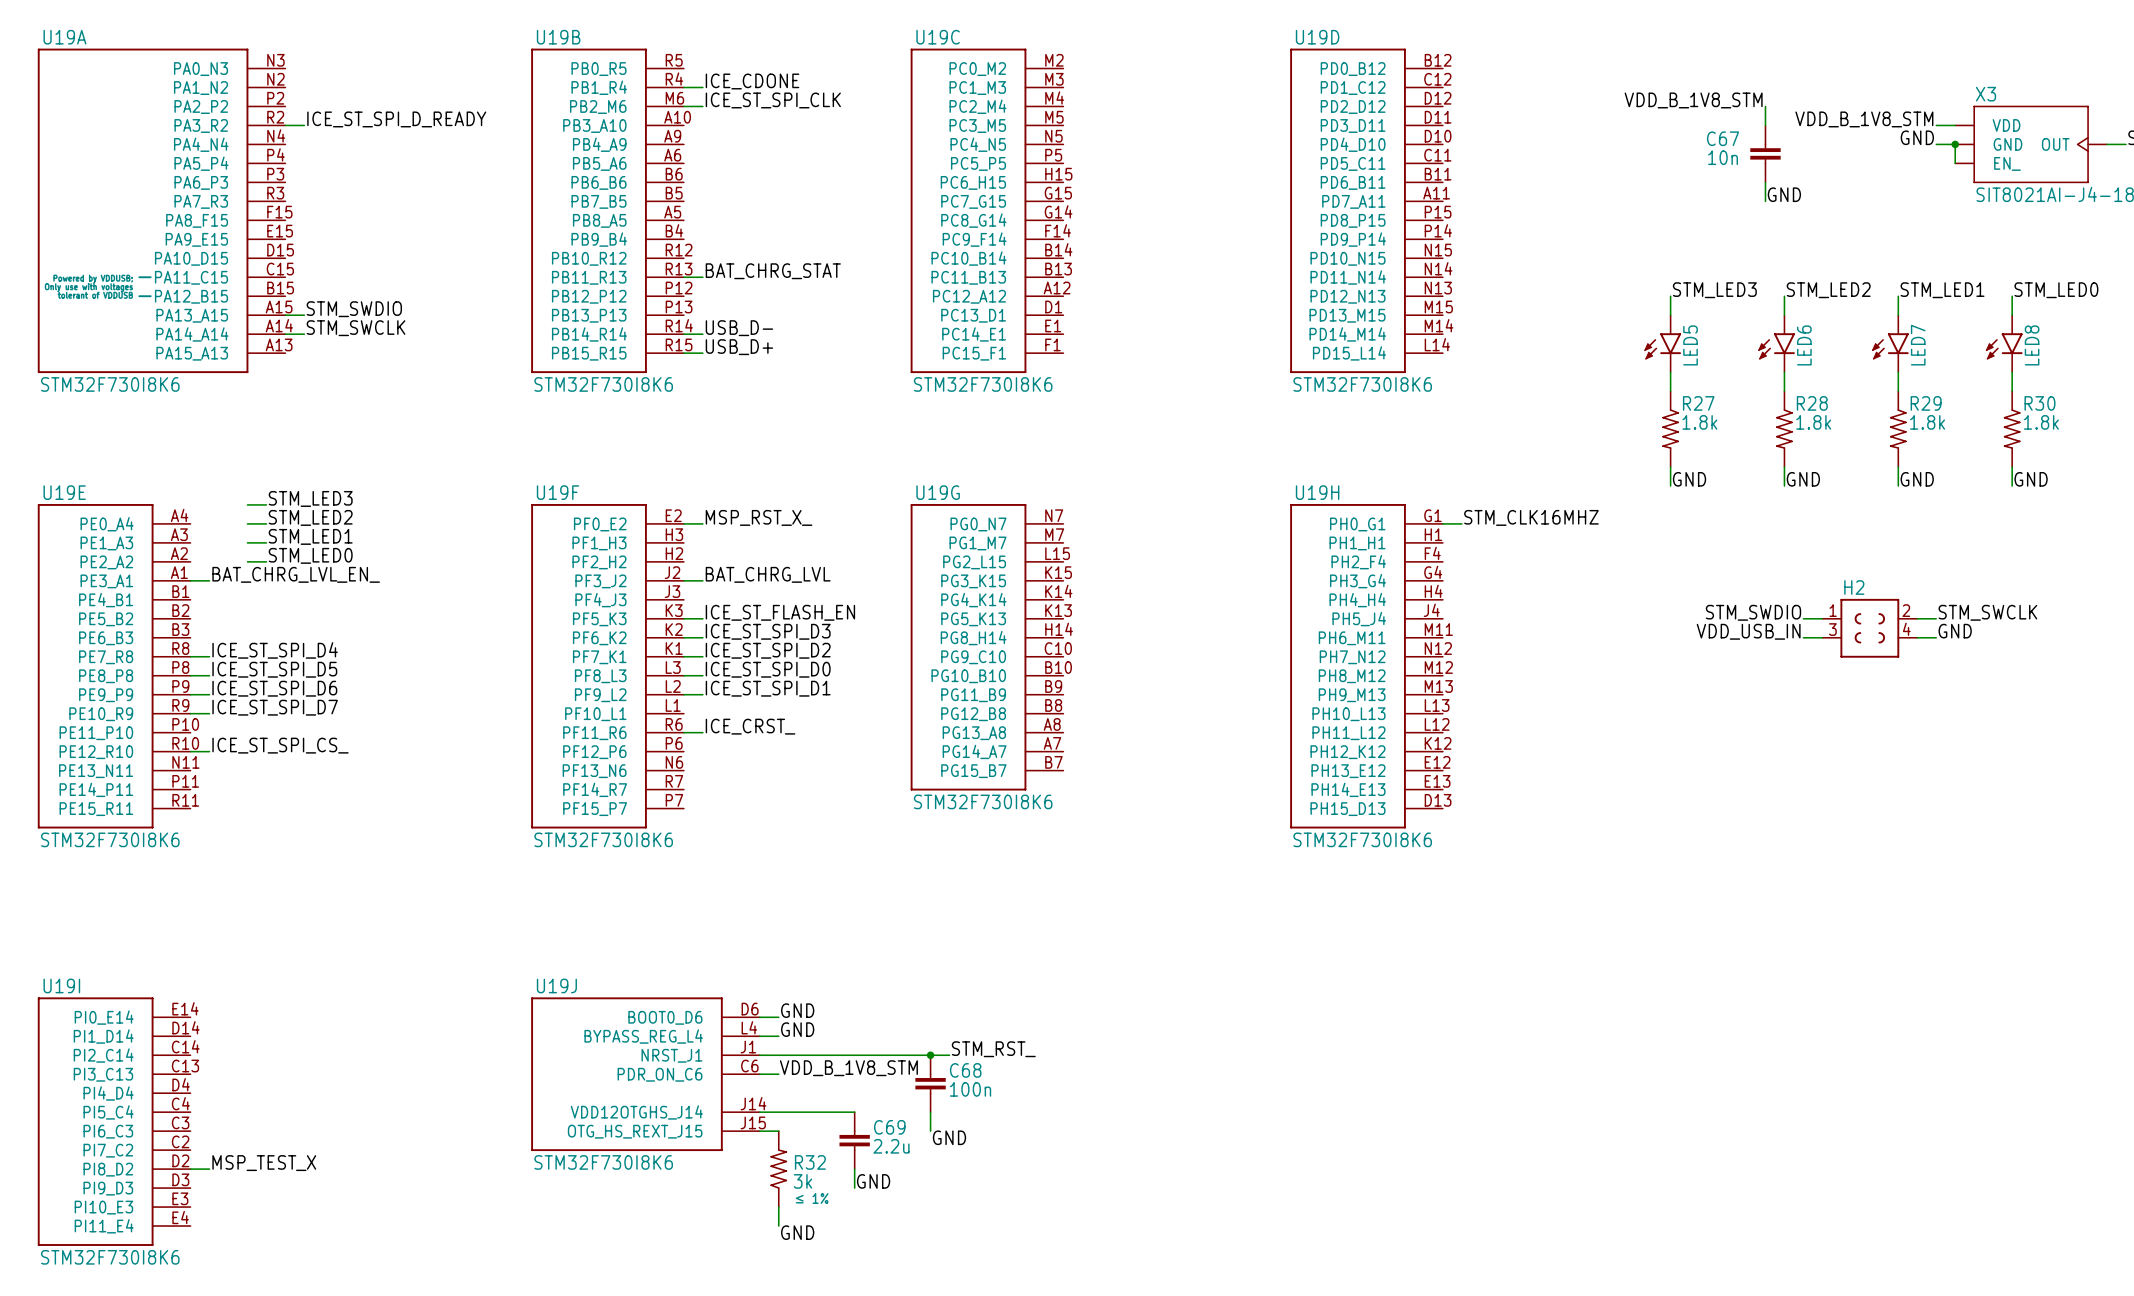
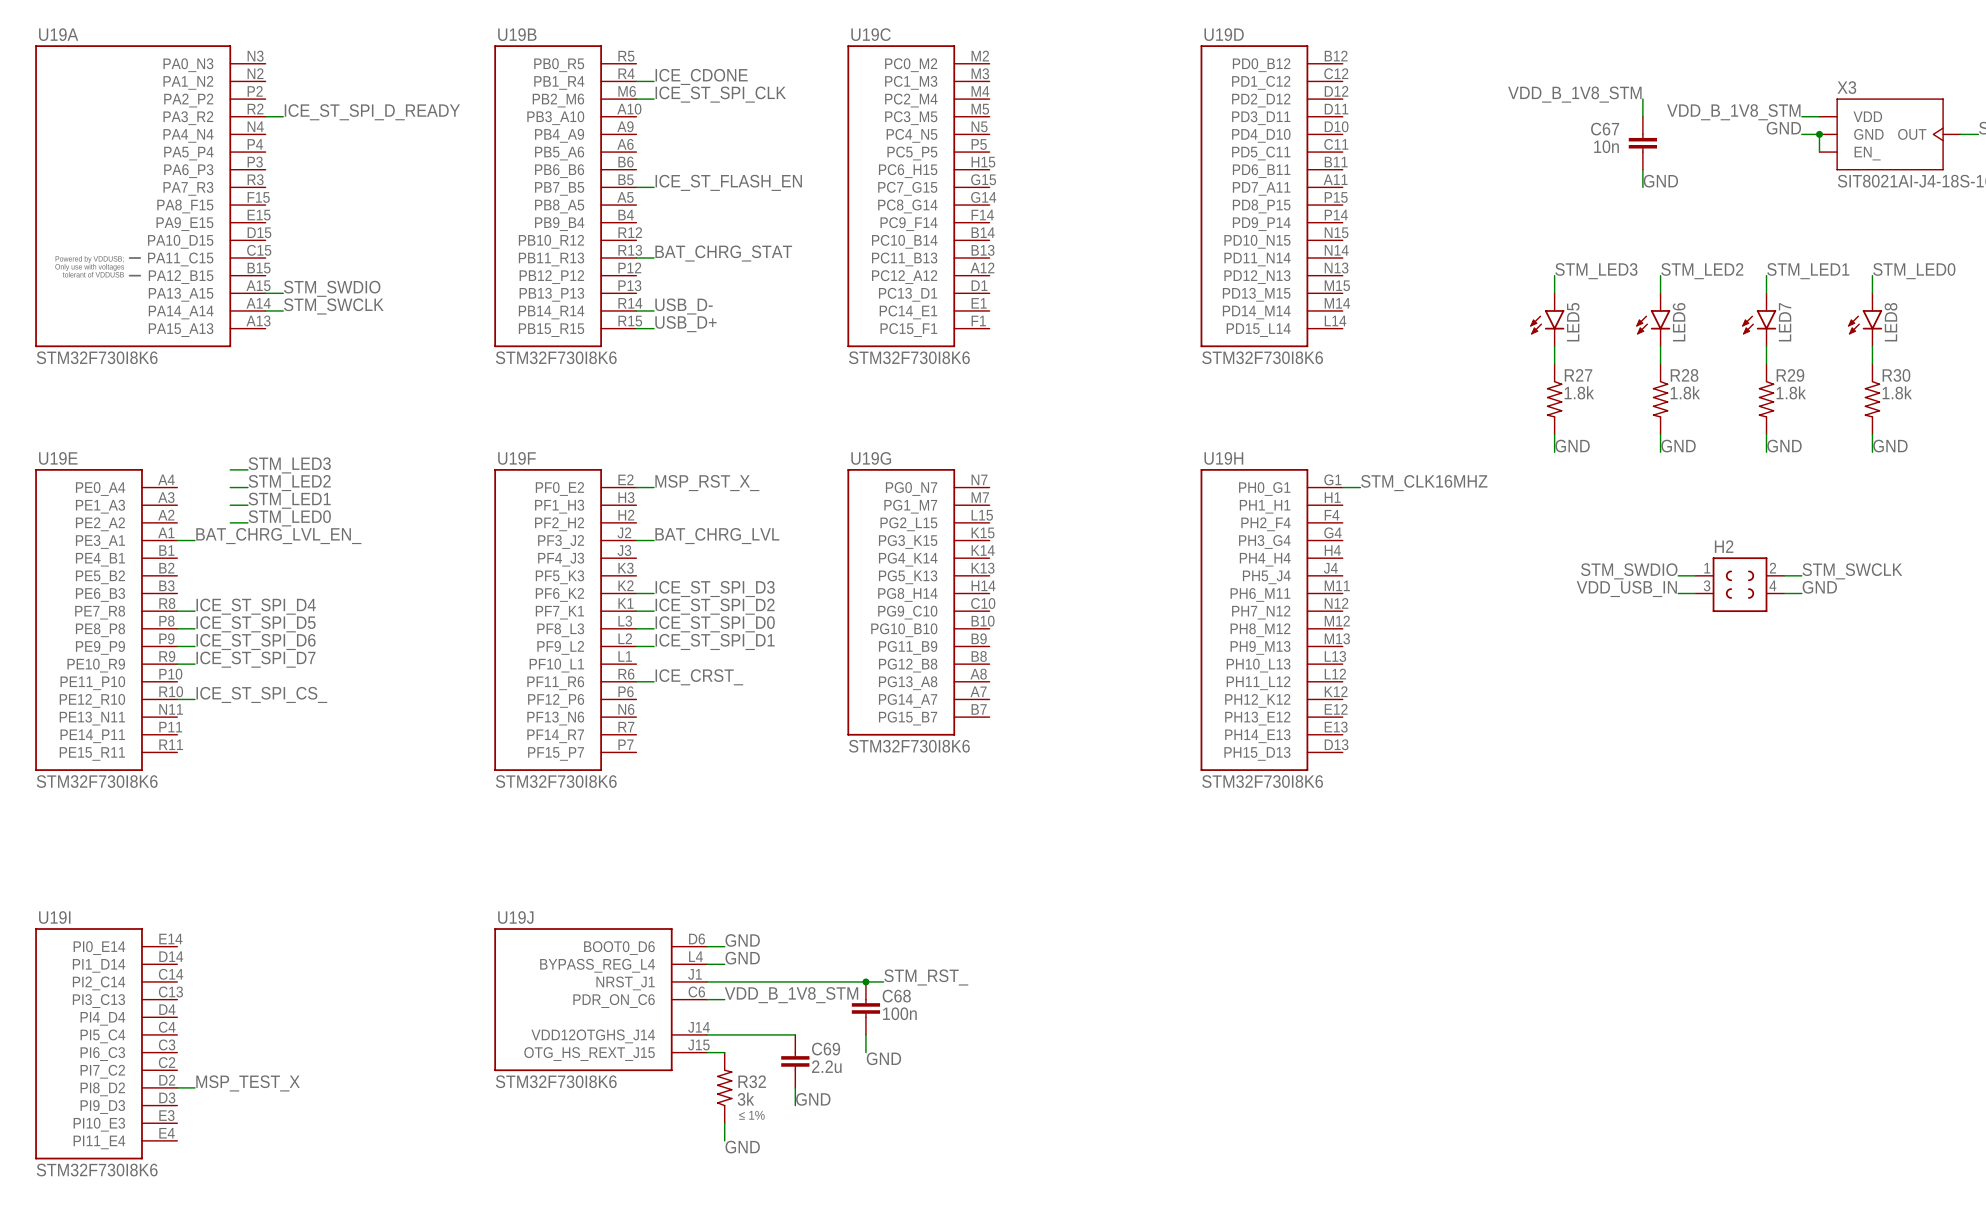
label: none -> ICE_ST_FLASH_EN (728, 182)
wire: none -> (636, 187) (654, 187)
label: ICE_ST_FLASH_EN (780, 612) -> none
wire: (683, 618) (702, 618) -> none

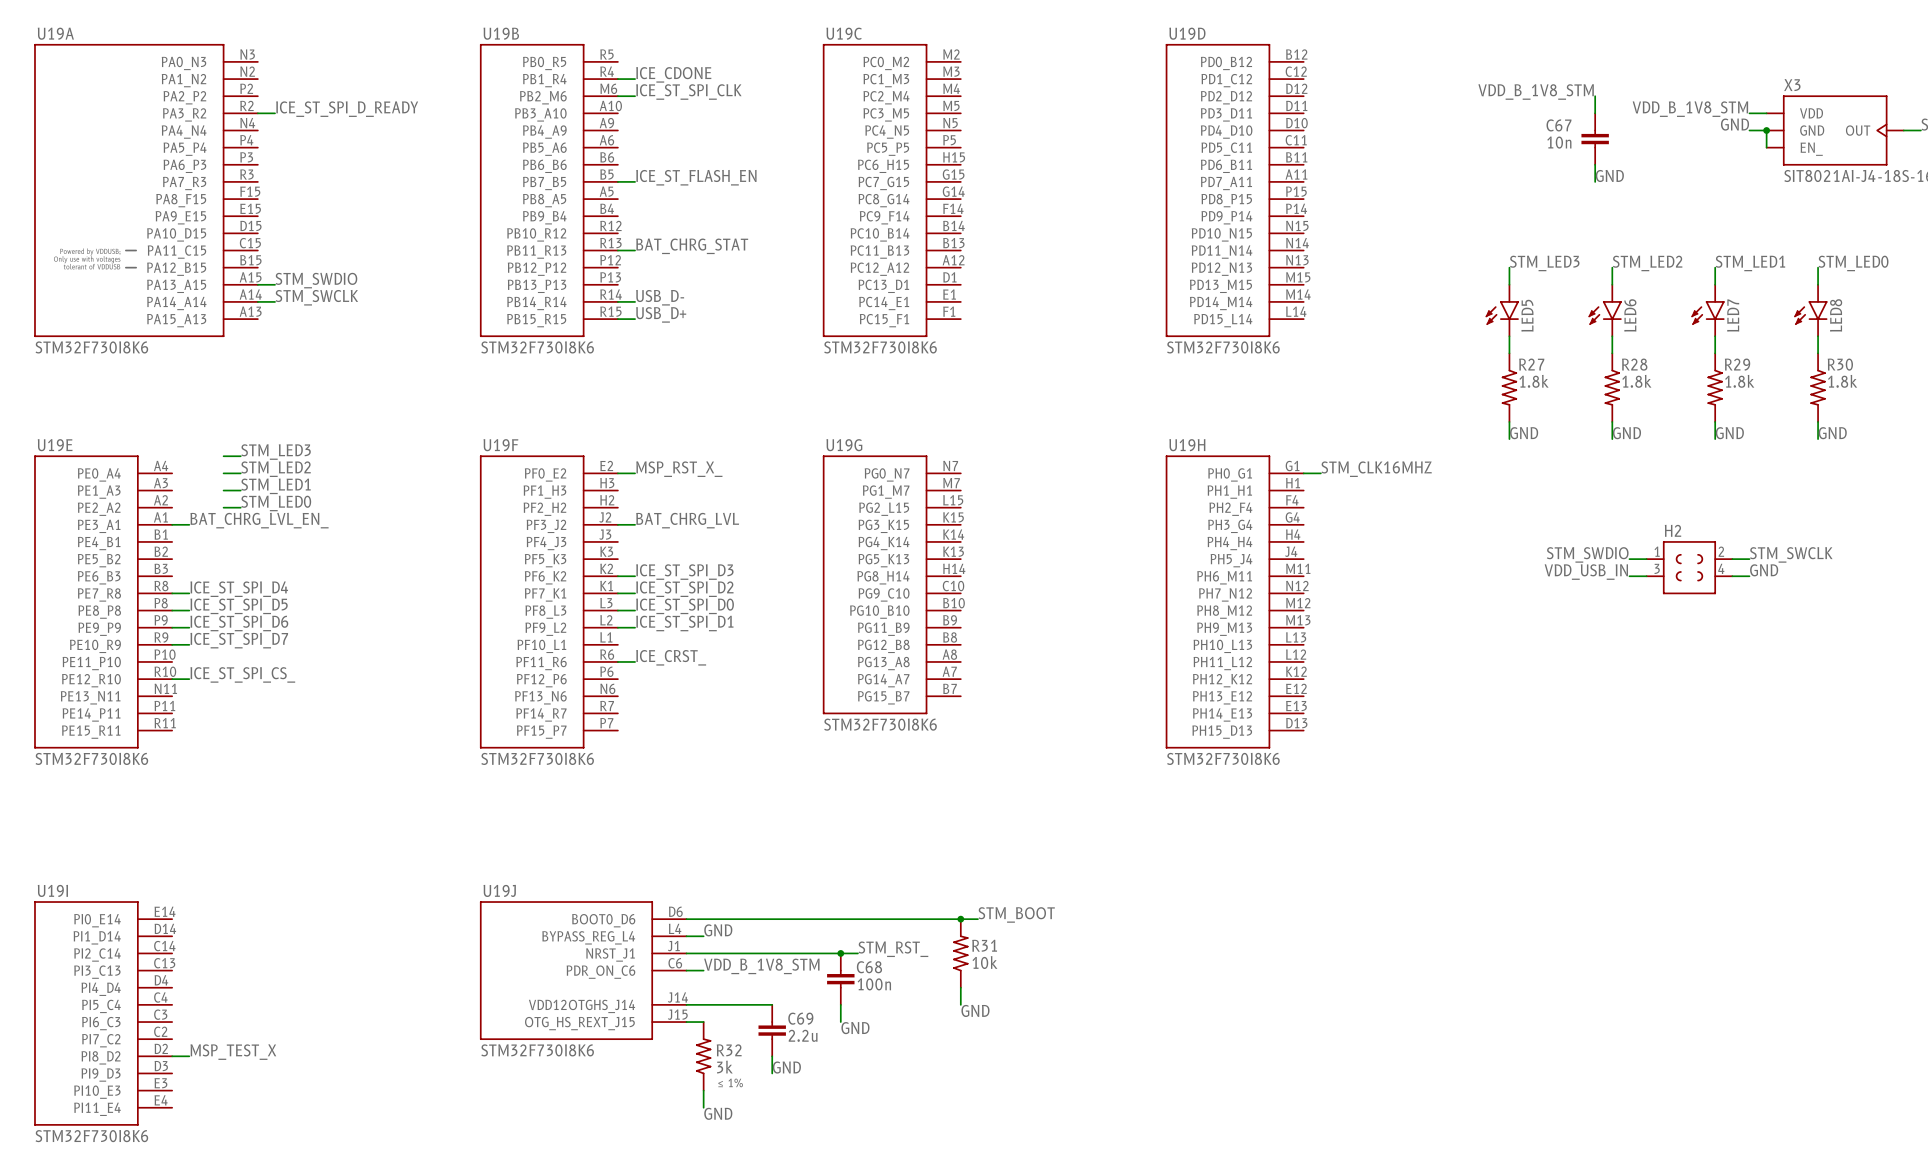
label: GND (742, 940) -> none
label: none -> STM_BOOT (1016, 914)
wire: none -> (703, 919) (977, 919)
junction: none -> (960, 919)
R31: none -> 10k (960, 953)
wire: none -> (960, 987) (960, 1004)
label: none -> GND (975, 1010)

